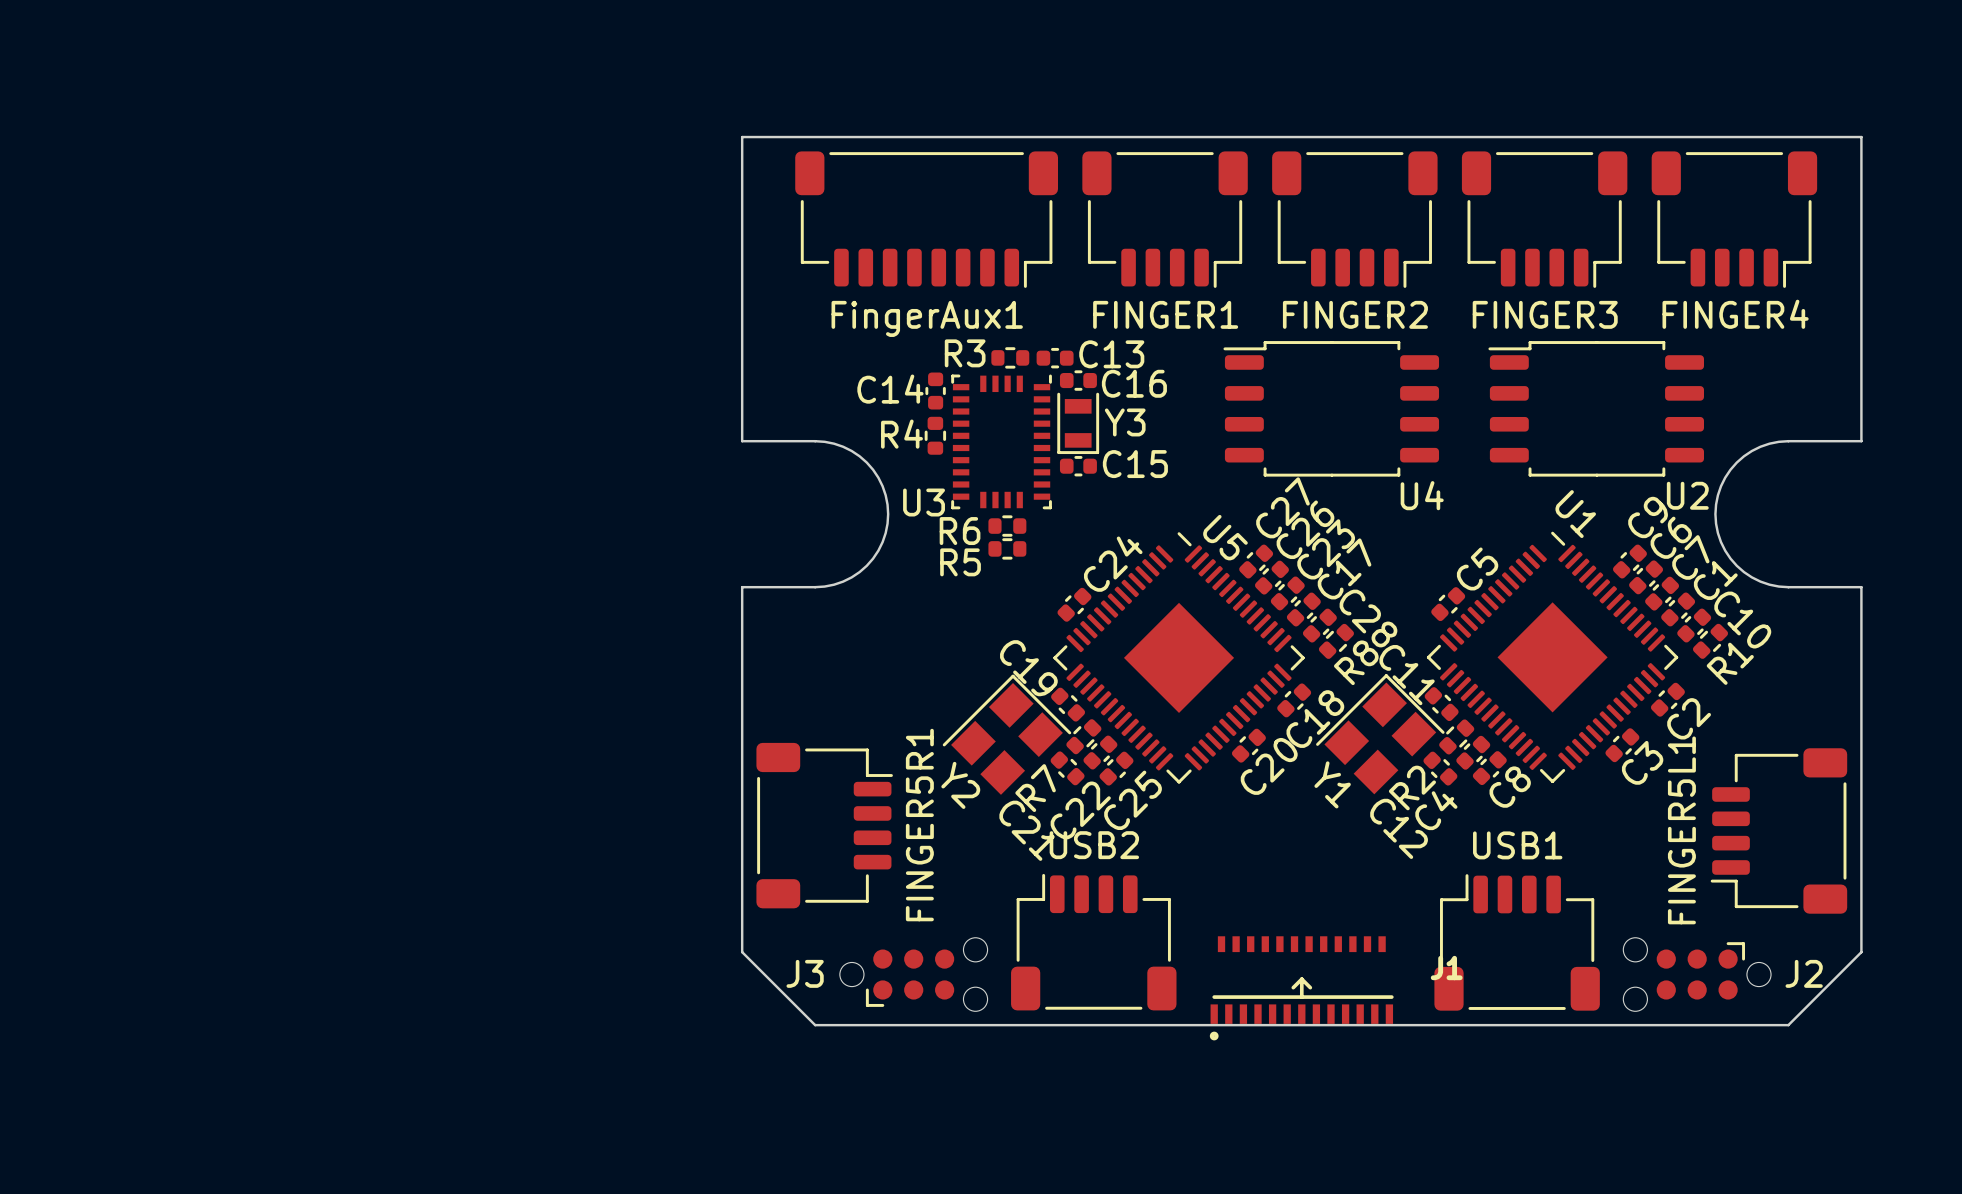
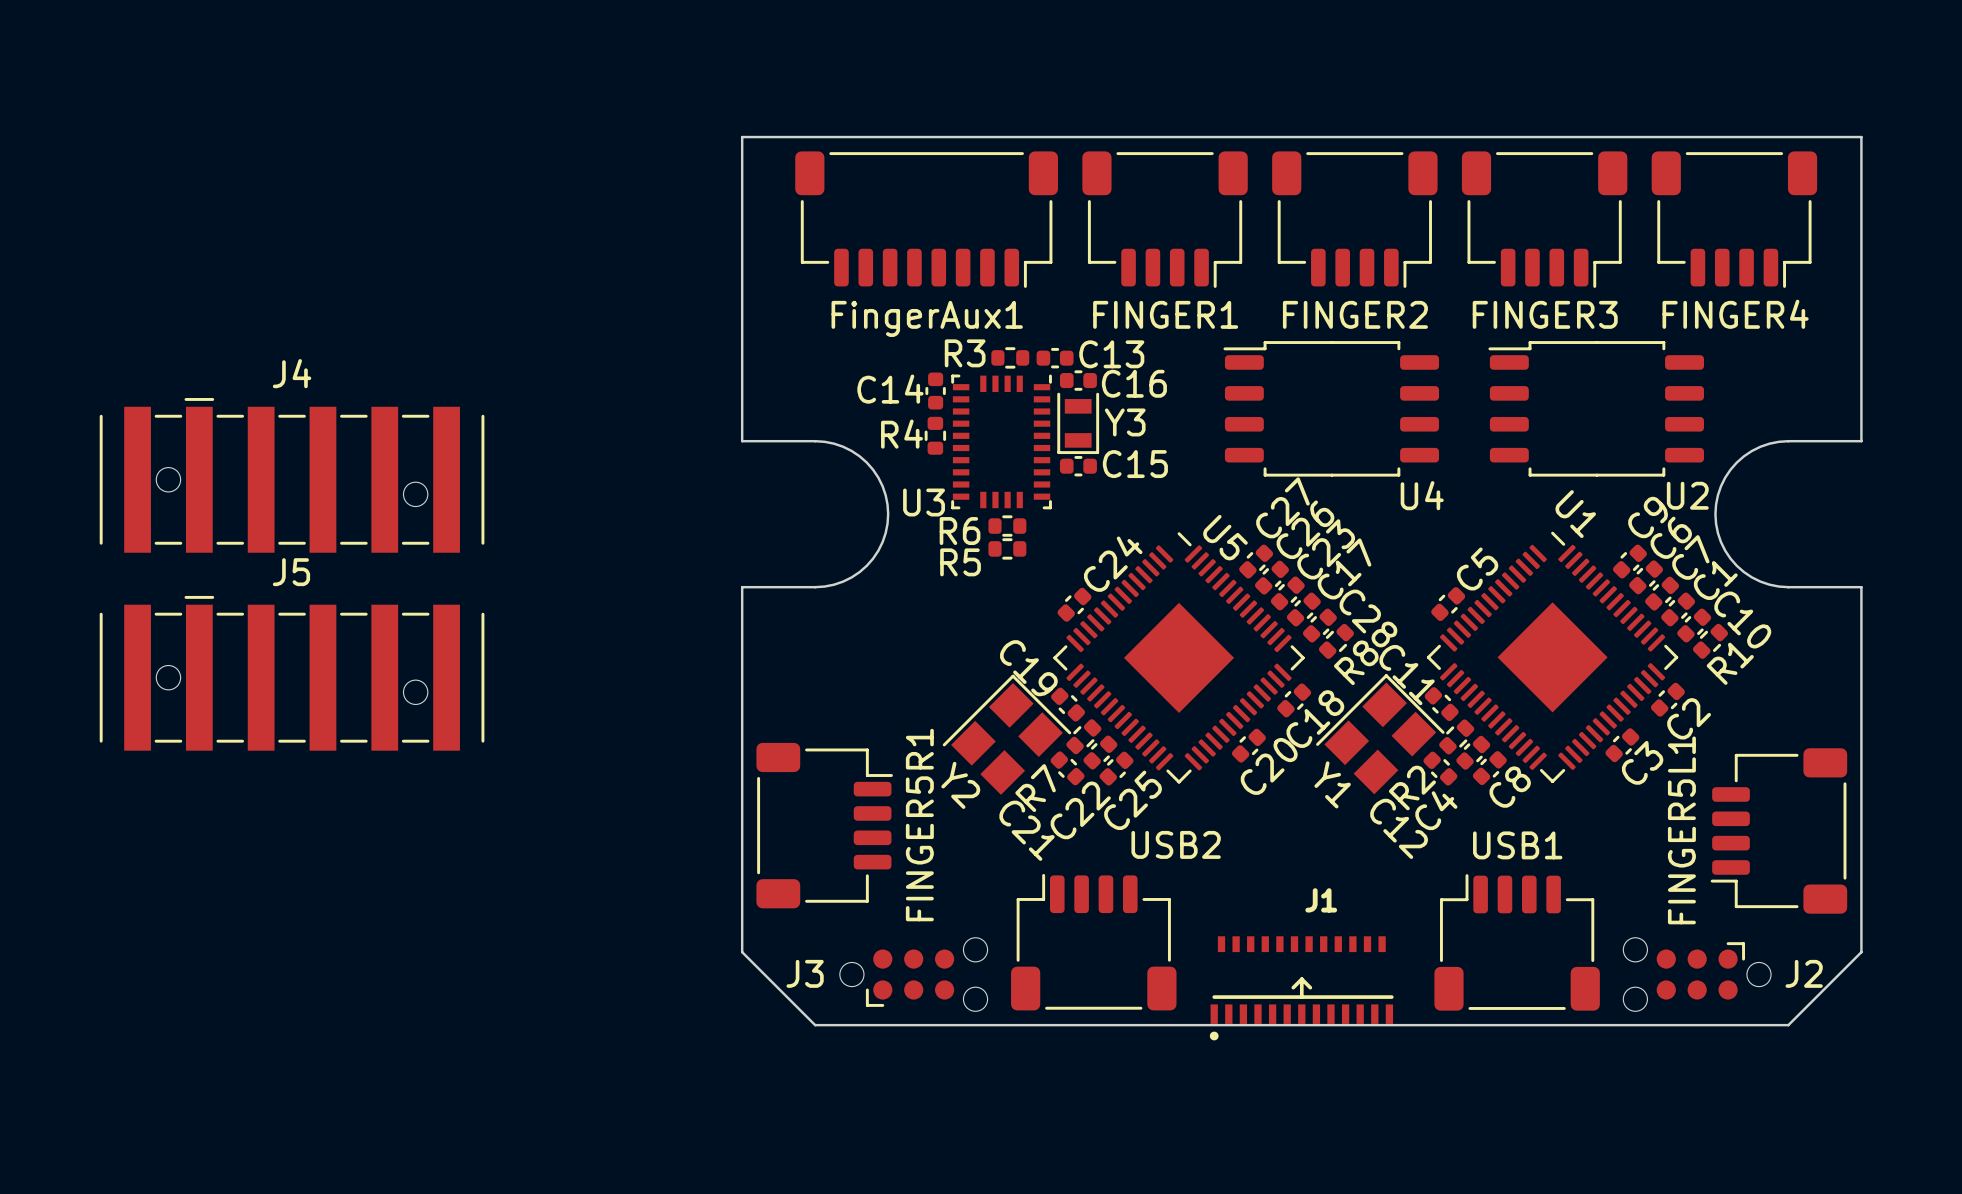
J4: none -> (292, 475)
J5: none -> (292, 673)
USB2 name position: USB2 (1094, 845) -> USB2 (1176, 844)
J1 name position: J1 (1446, 968) -> J1 (1321, 900)

